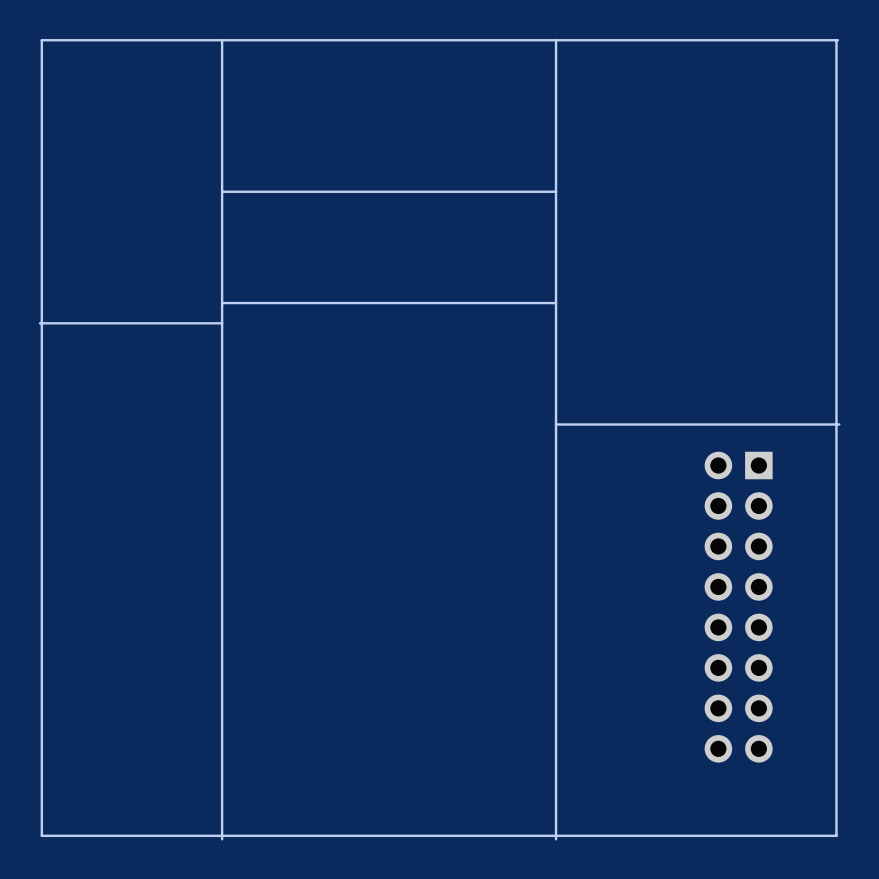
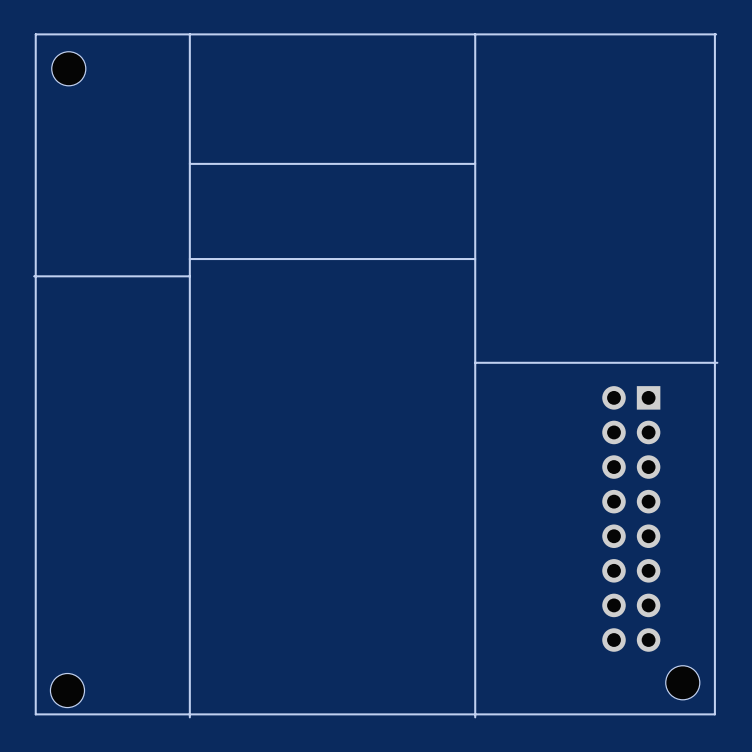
part: none -> (68, 68)
part: none -> (682, 682)
part: none -> (67, 690)

